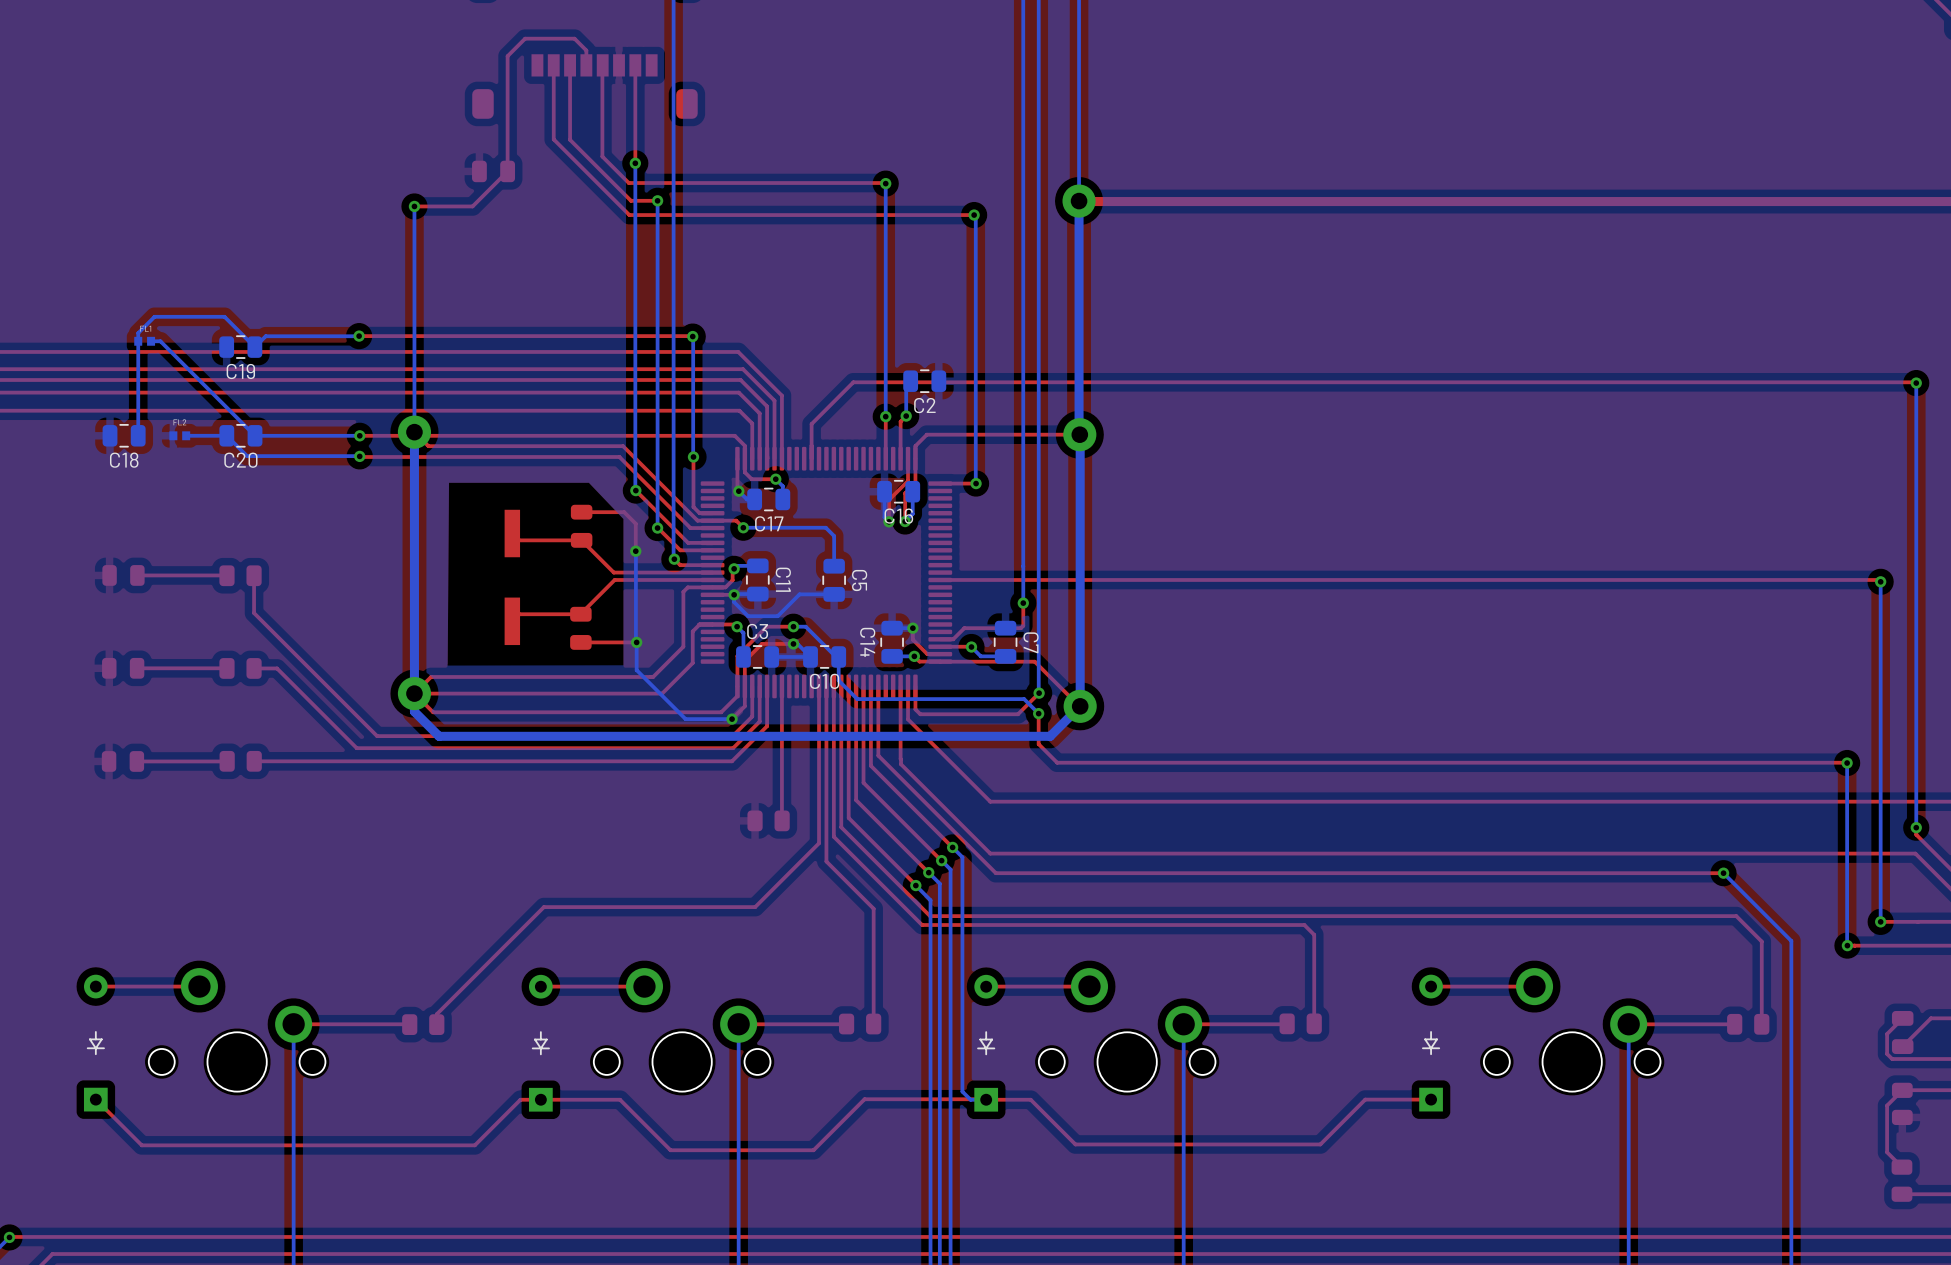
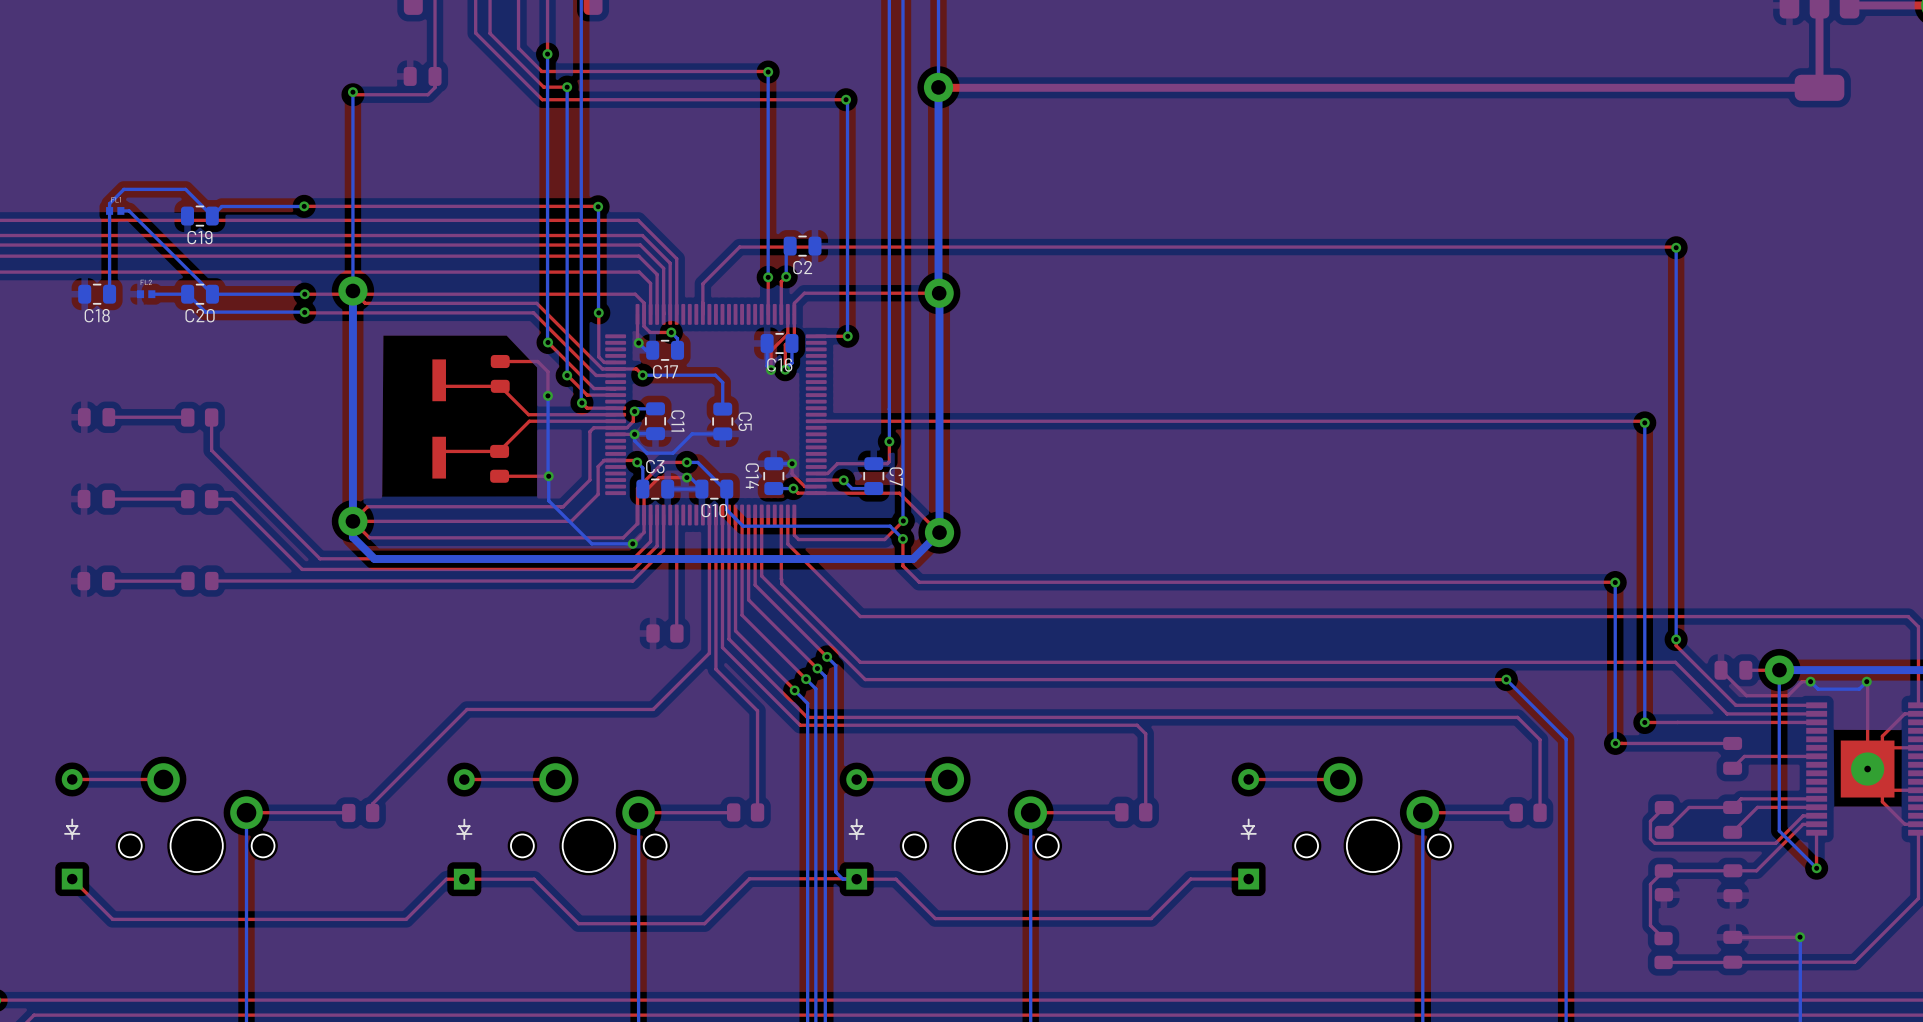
part position: (493, 171) -> (422, 76)
top track: (507, 171) (472, 206) (414, 206) -> (435, 61) (435, 87) (427, 94) (352, 94)

